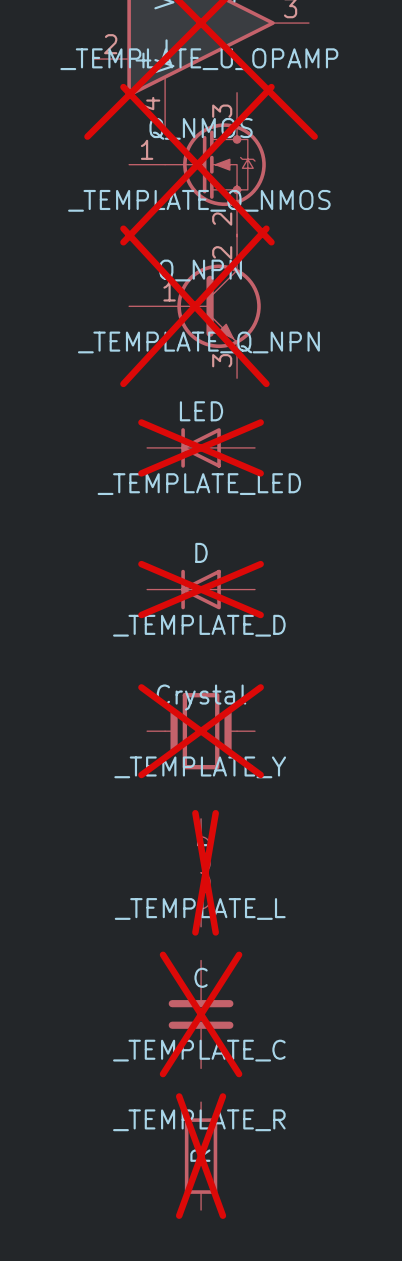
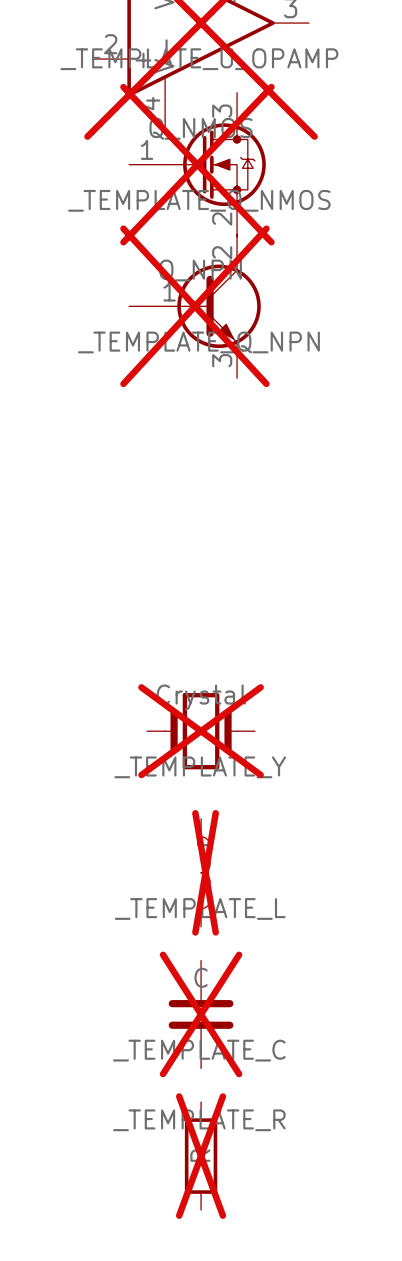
_TEMPLATE_LED: LED (201, 447) -> none
_TEMPLATE_D: D (201, 589) -> none

